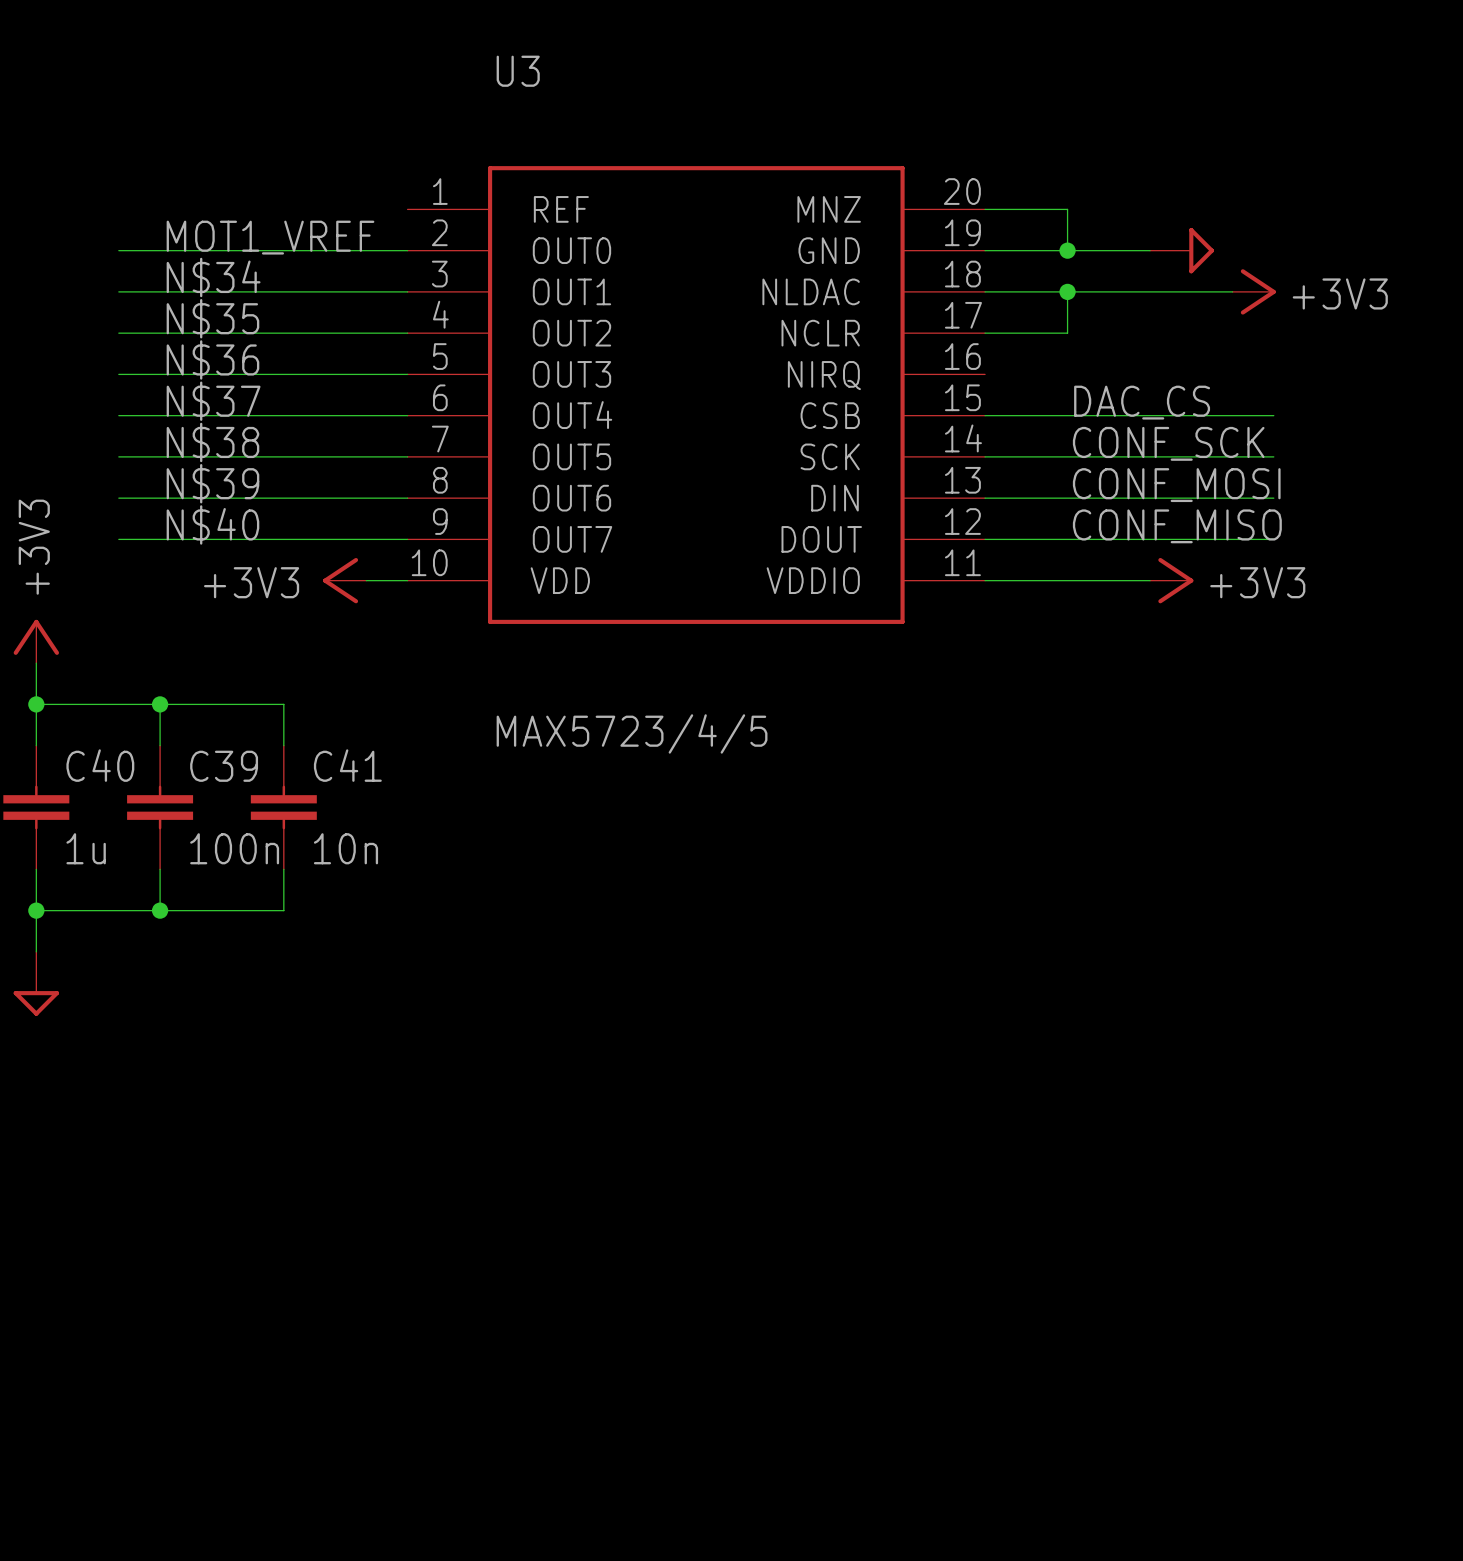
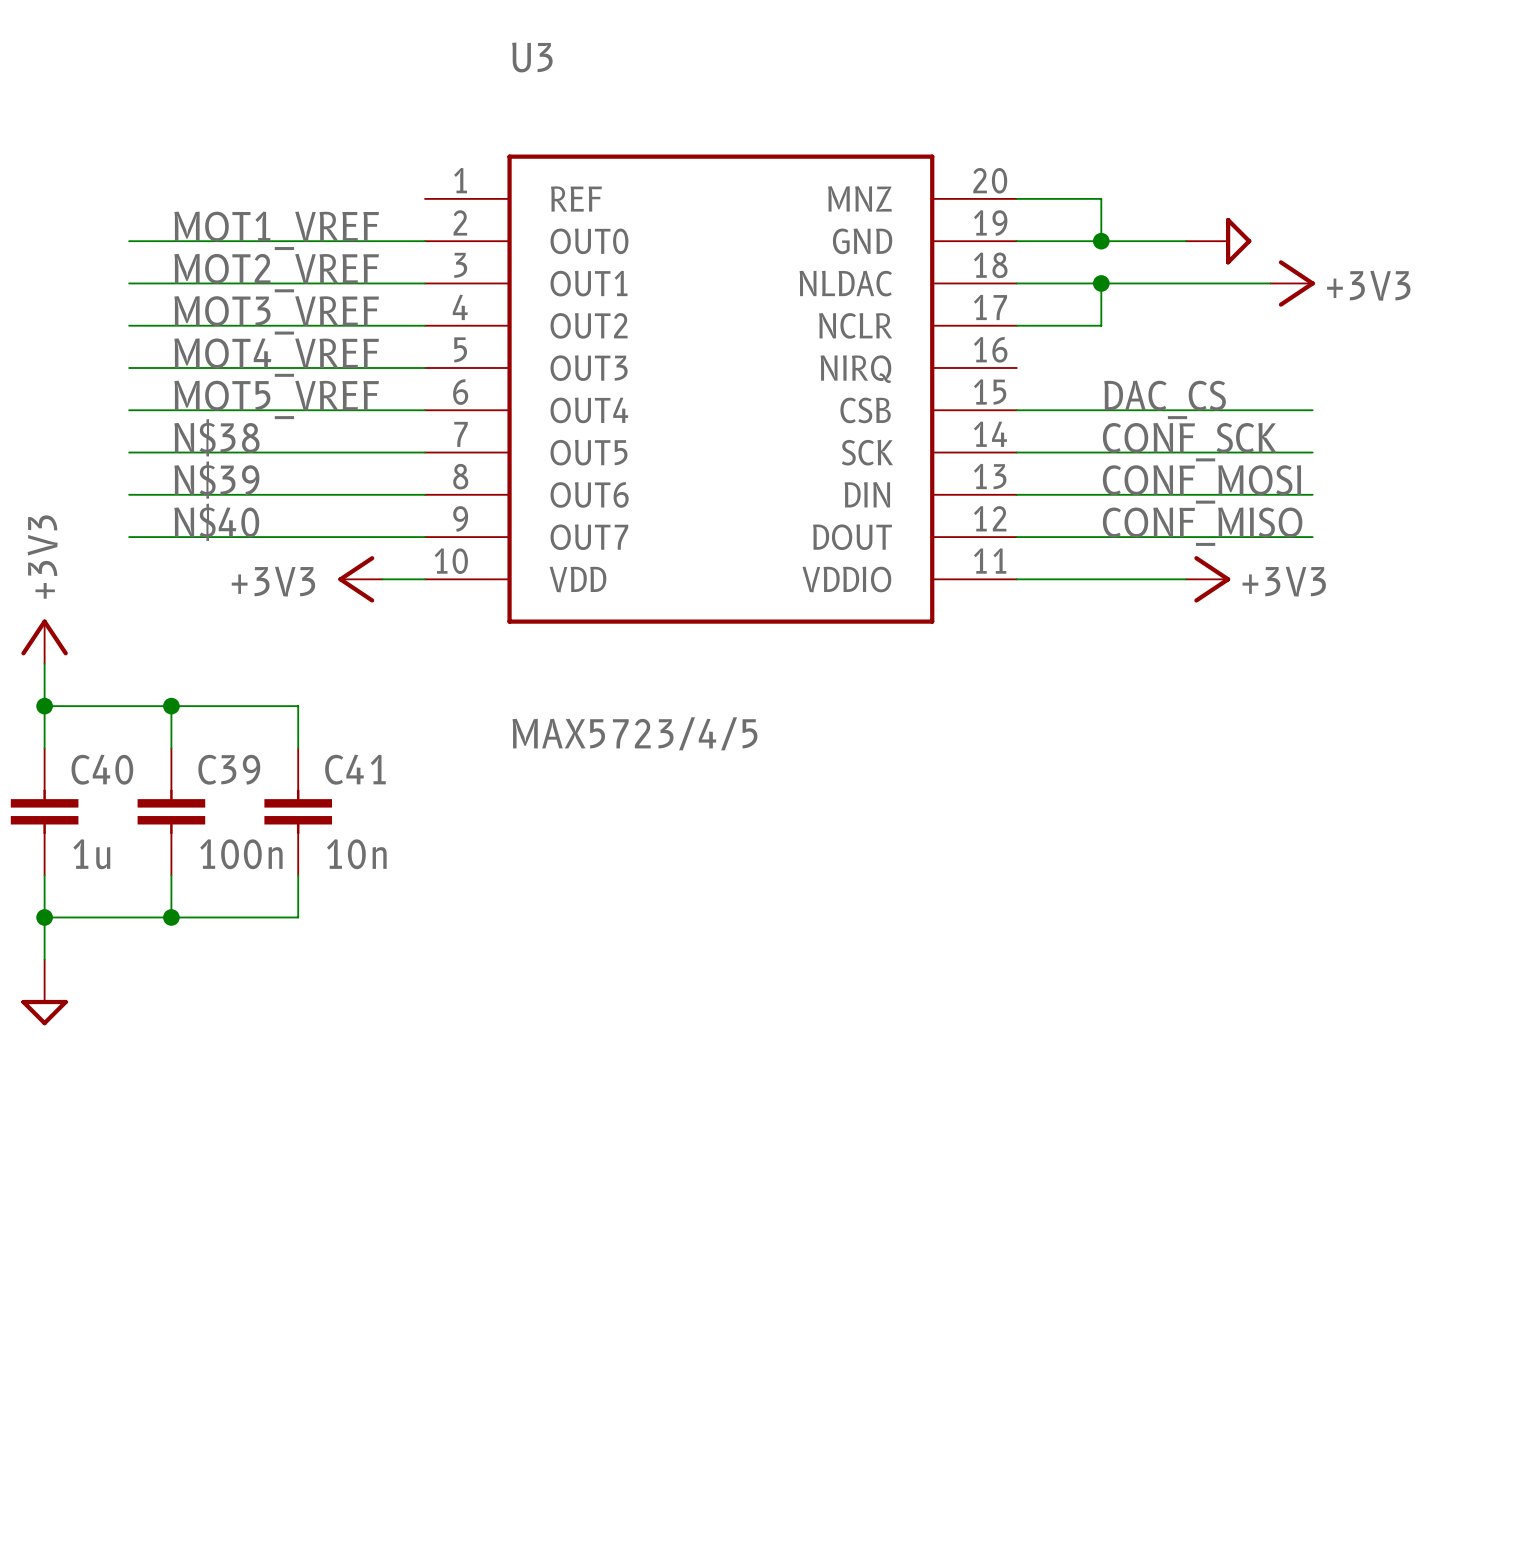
label: N$34 (213, 277) -> MOT2_VREF (276, 273)
label: N$35 (212, 318) -> MOT3_VREF (276, 315)
label: N$36 (212, 359) -> MOT4_VREF (276, 357)
label: N$37 (213, 401) -> MOT5_VREF (276, 399)

